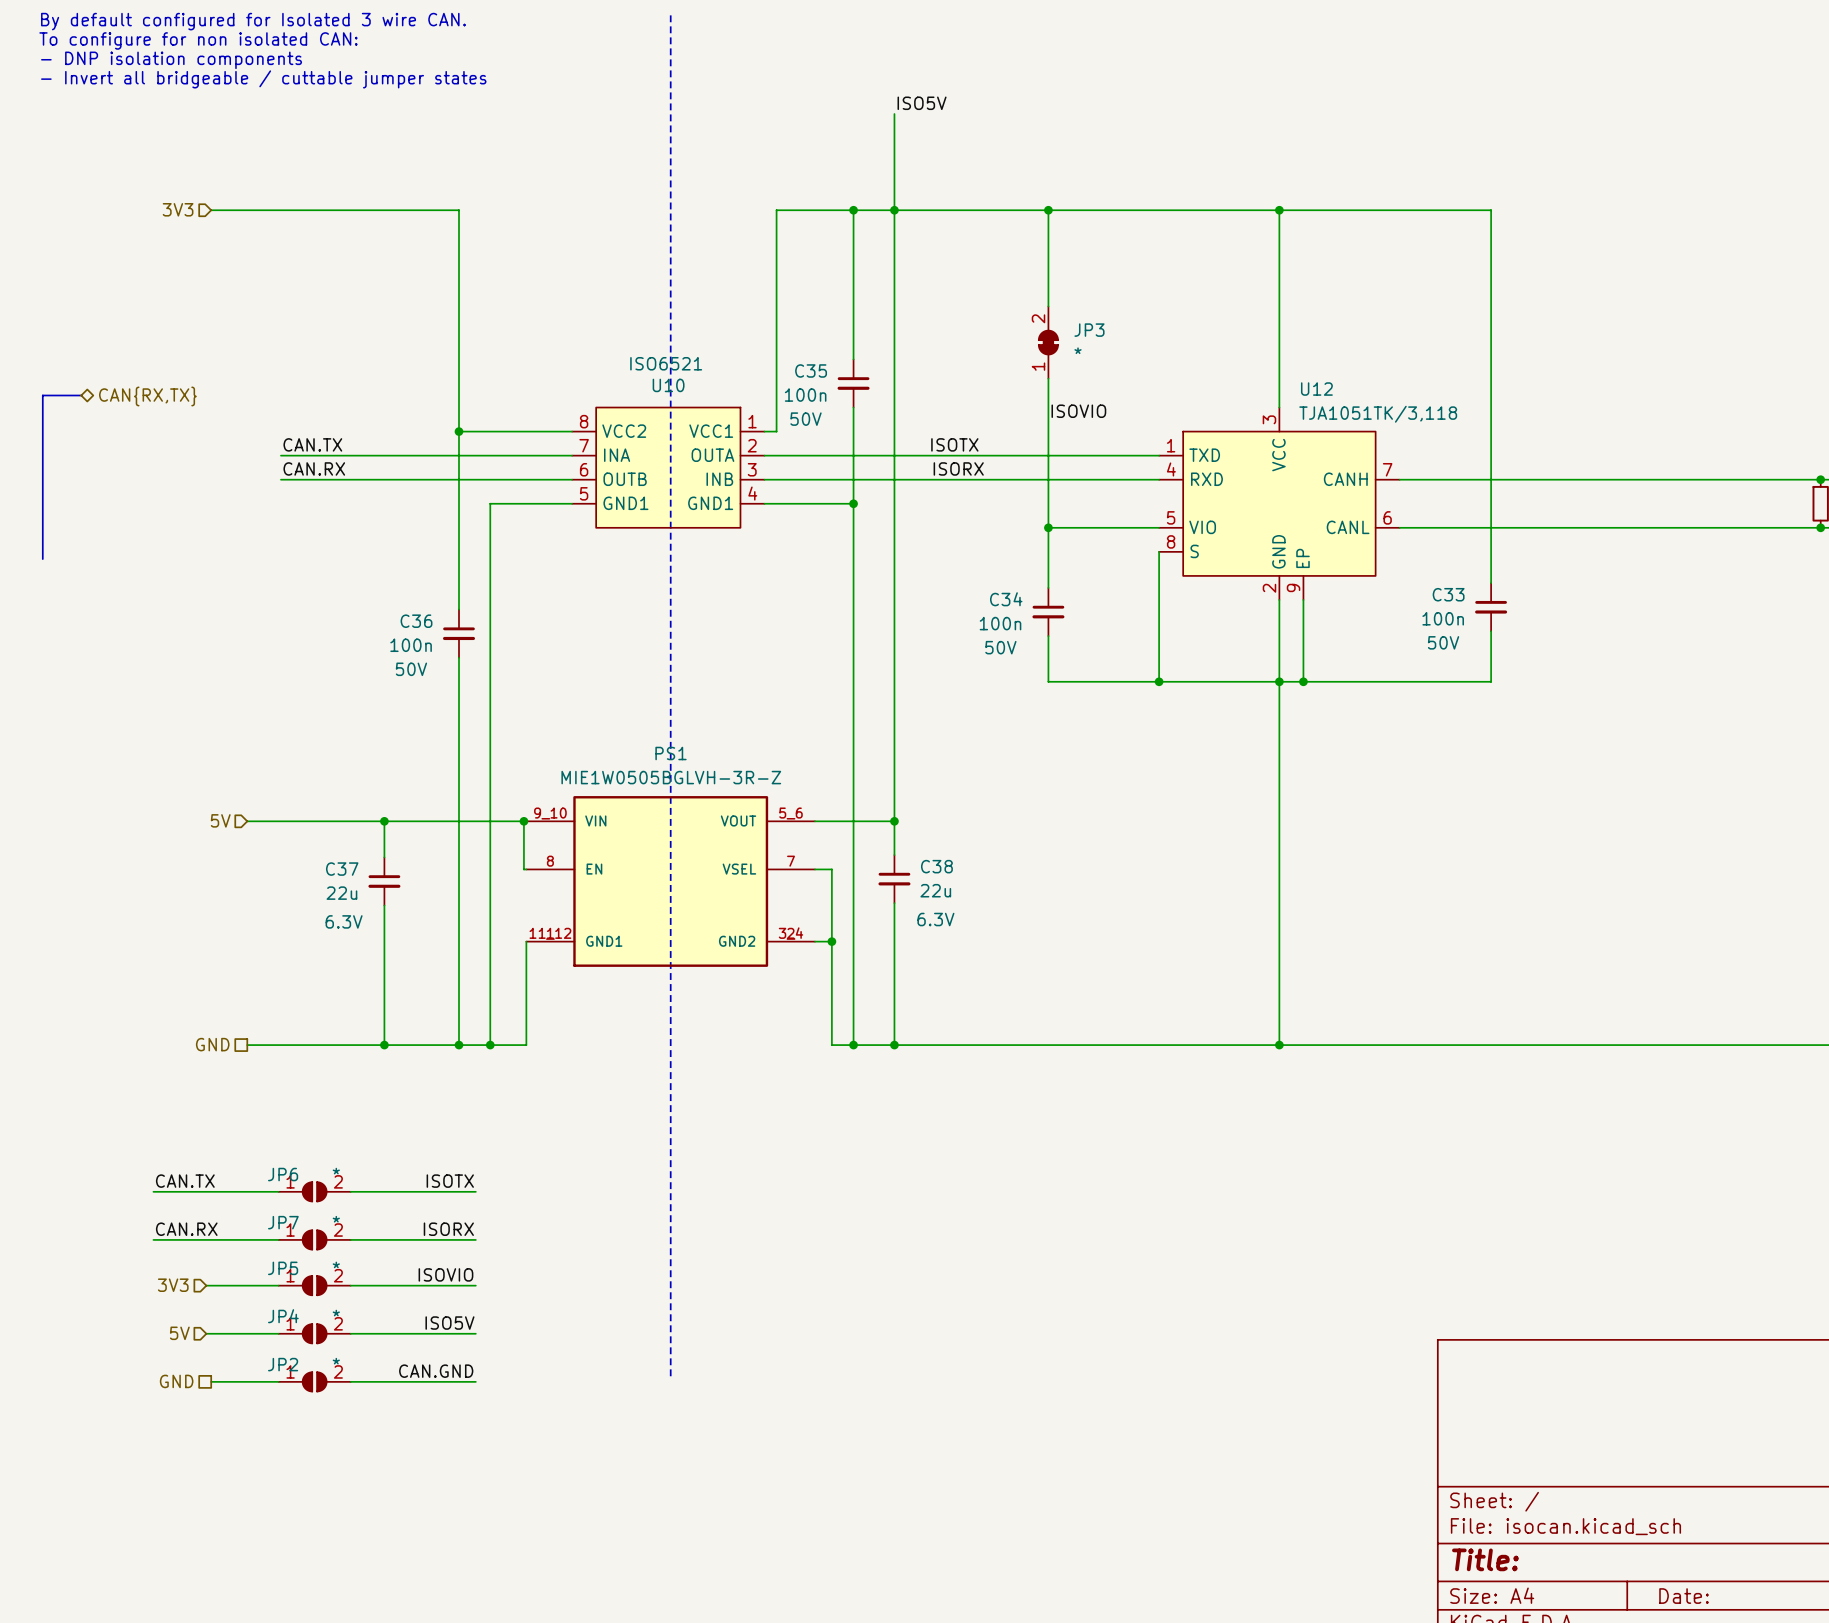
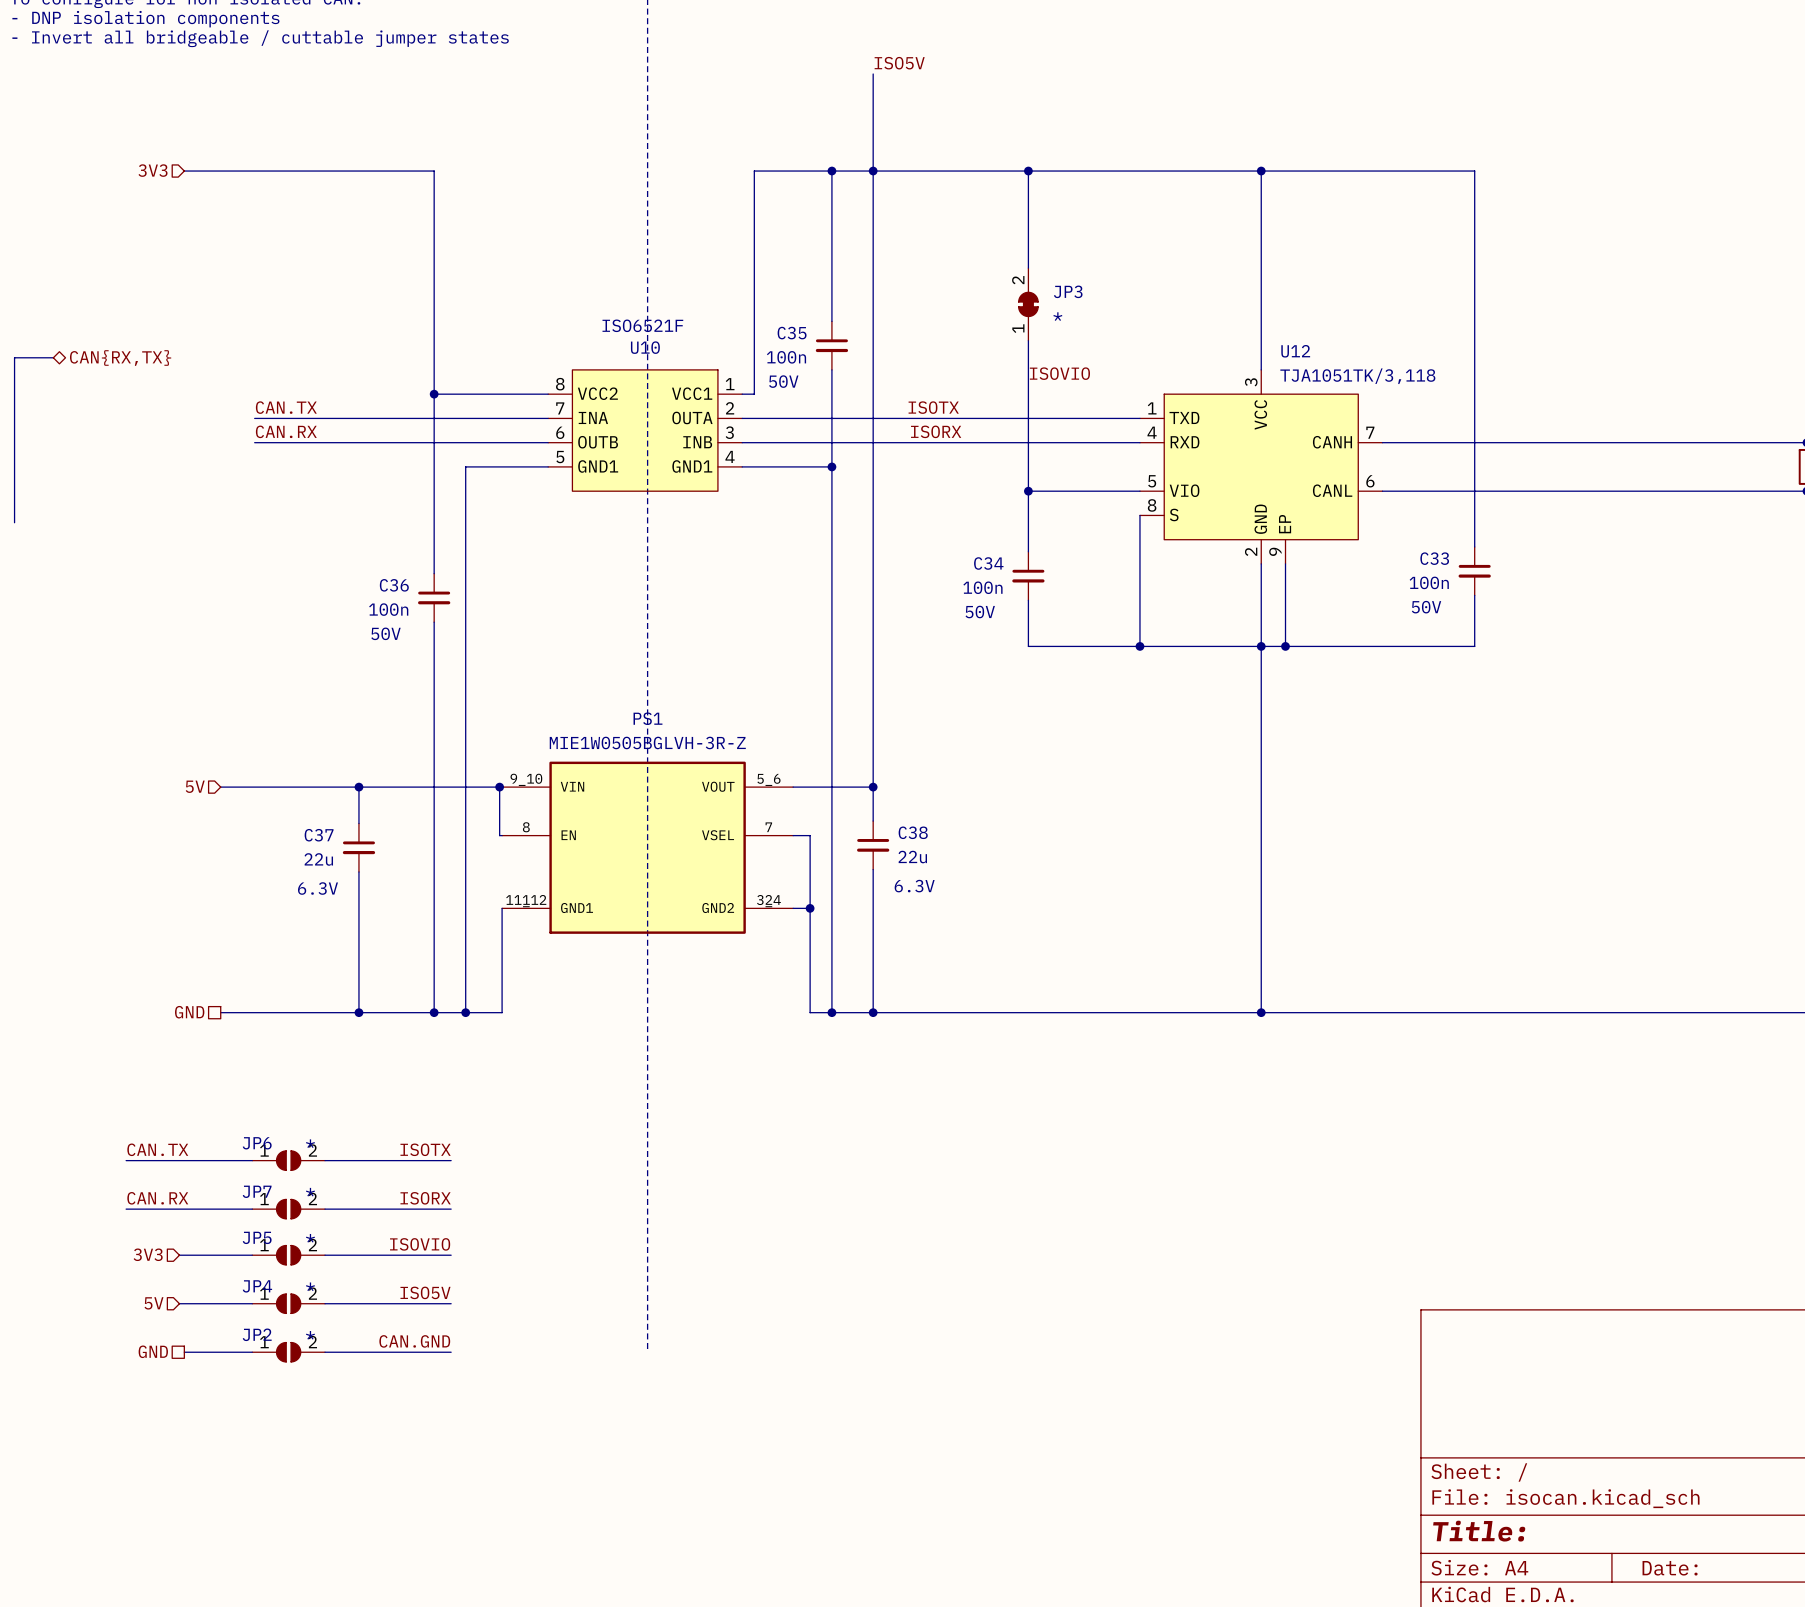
U10 value: ISO6521 (666, 363) -> ISO6521F (642, 325)

